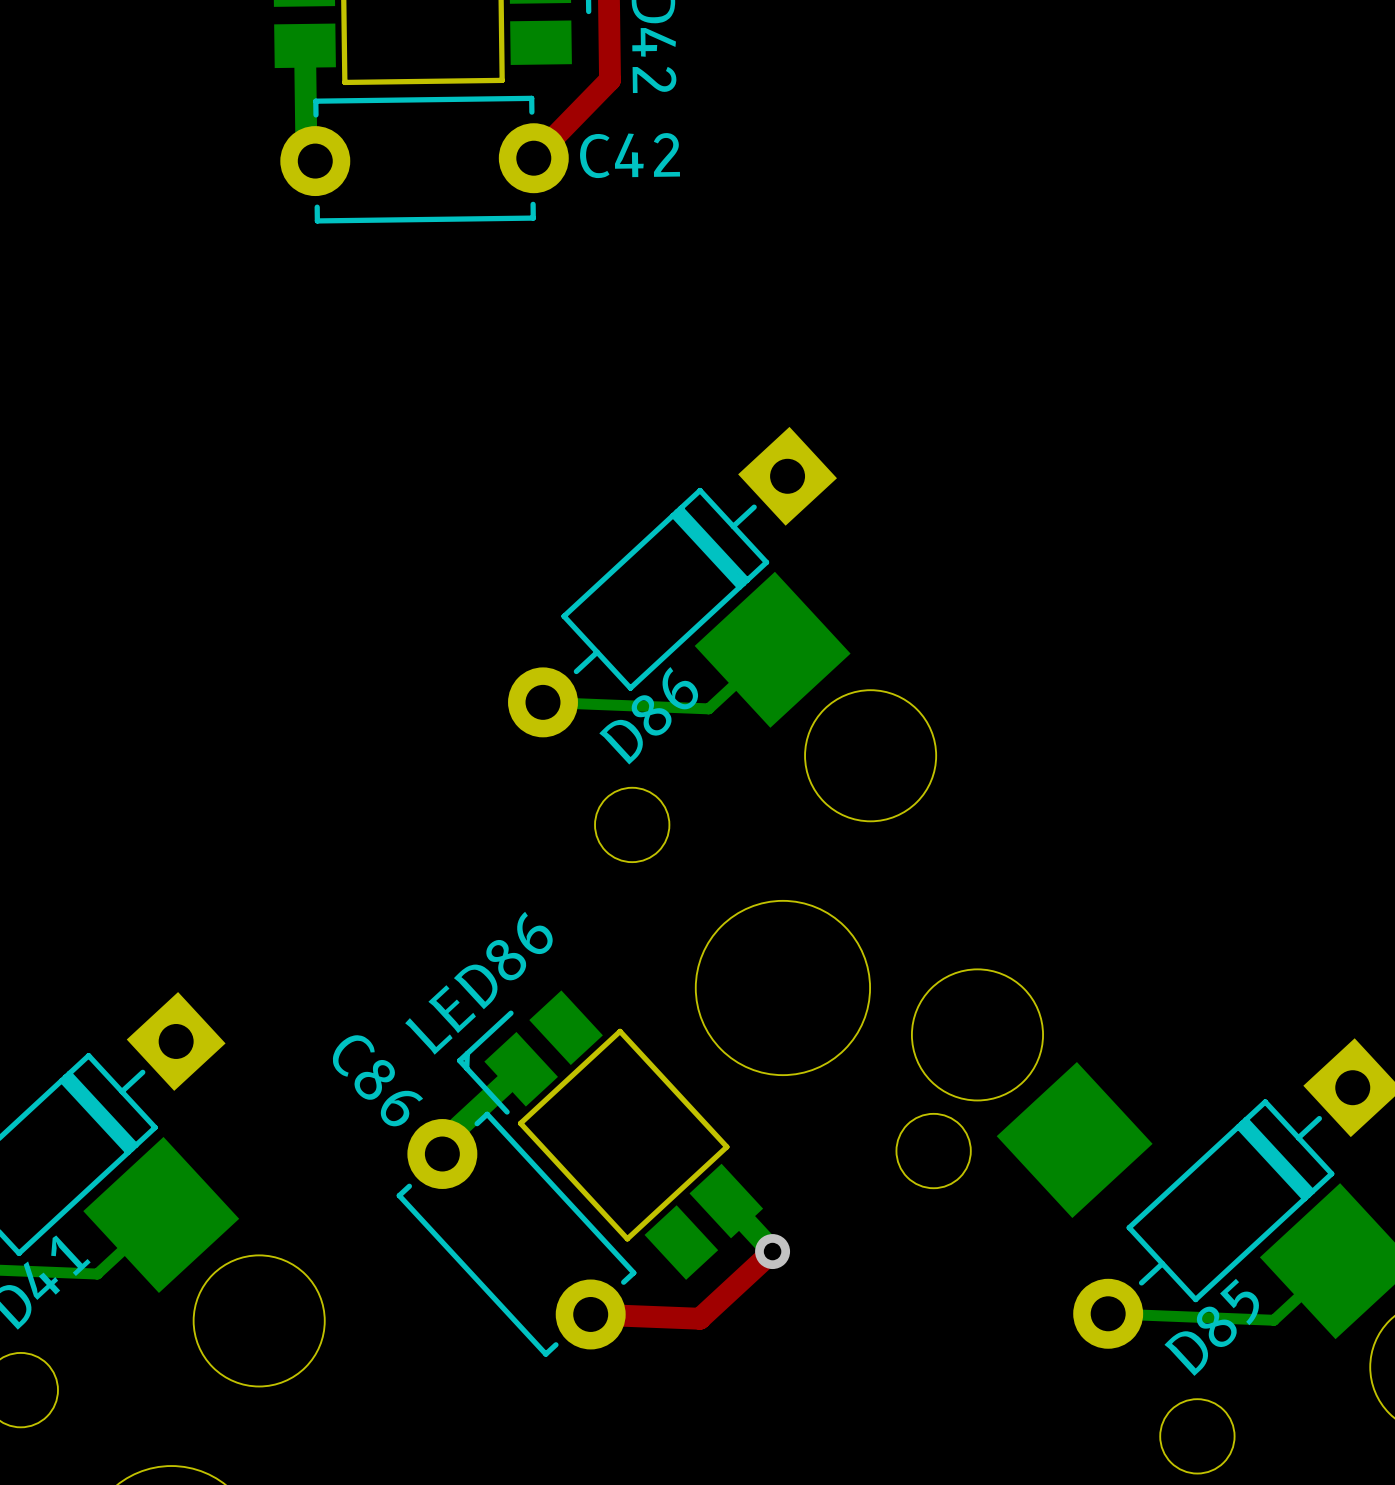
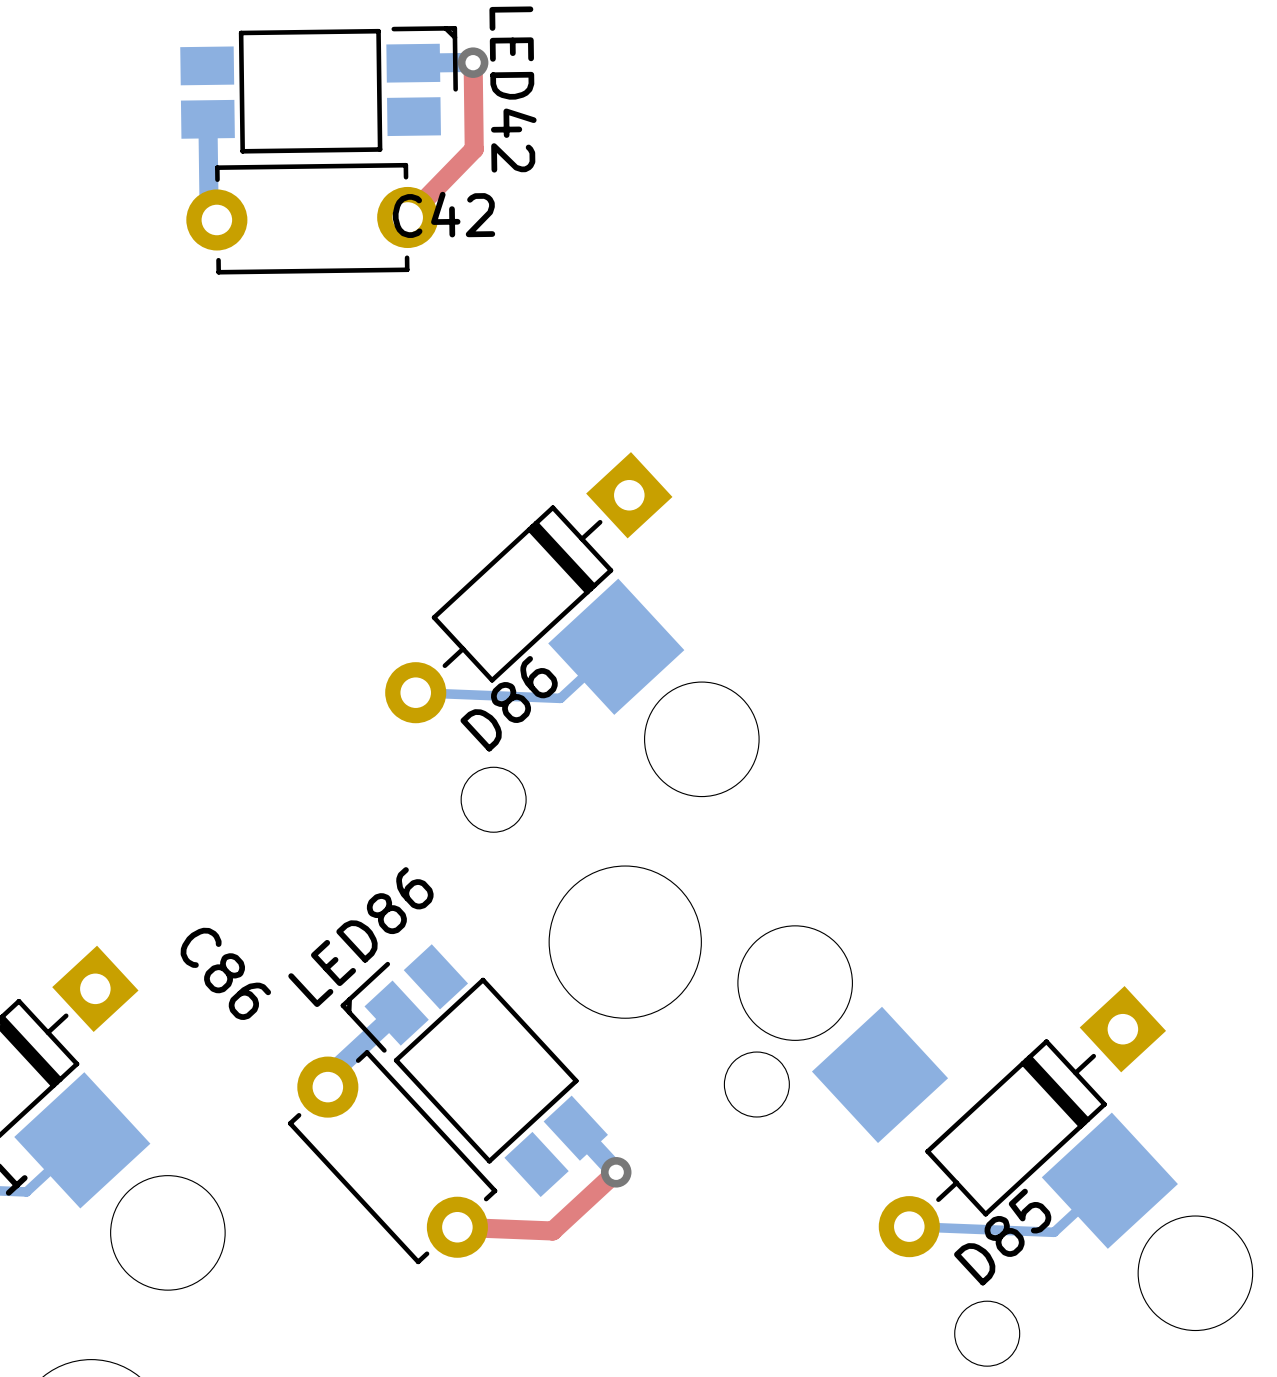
C42 name position: C42 (629, 155) -> C42 (443, 214)
C86 name position: C86 (377, 1080) -> C86 (225, 973)

